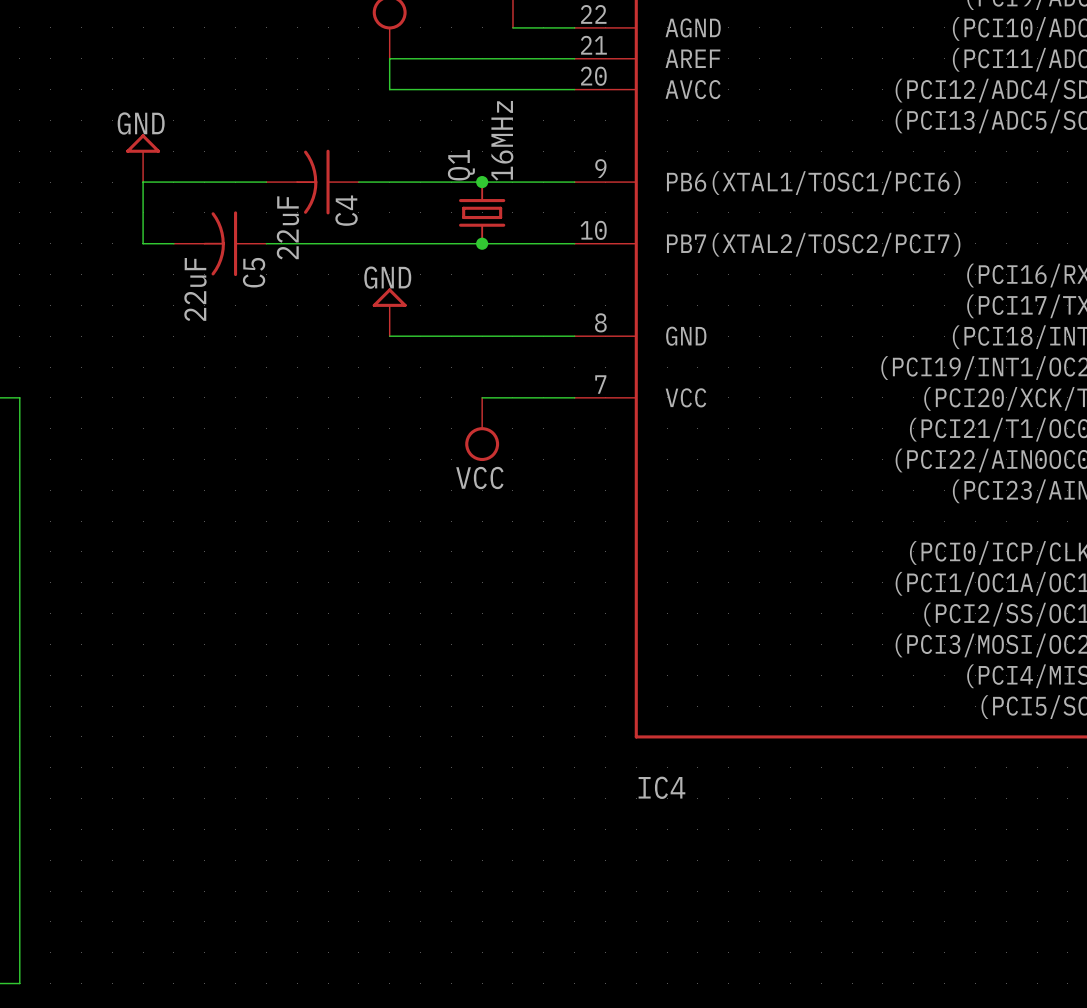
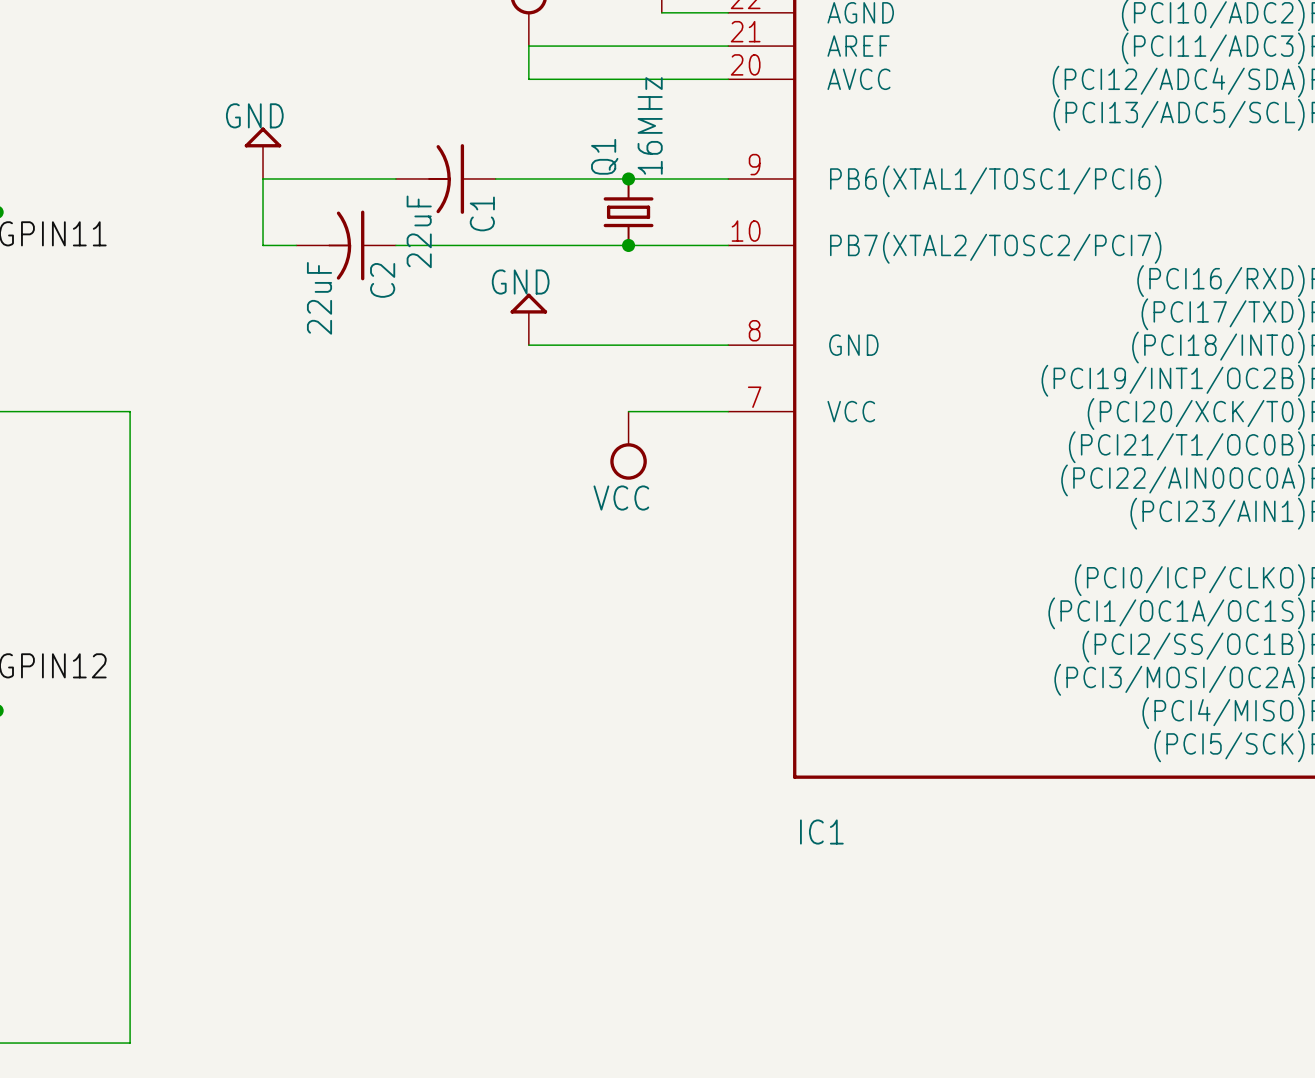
C4 name: C4 (346, 210) -> C1 (482, 213)
C5 name: C5 (254, 272) -> C2 (382, 280)
IC4 name: IC4 (661, 787) -> IC1 (821, 832)

